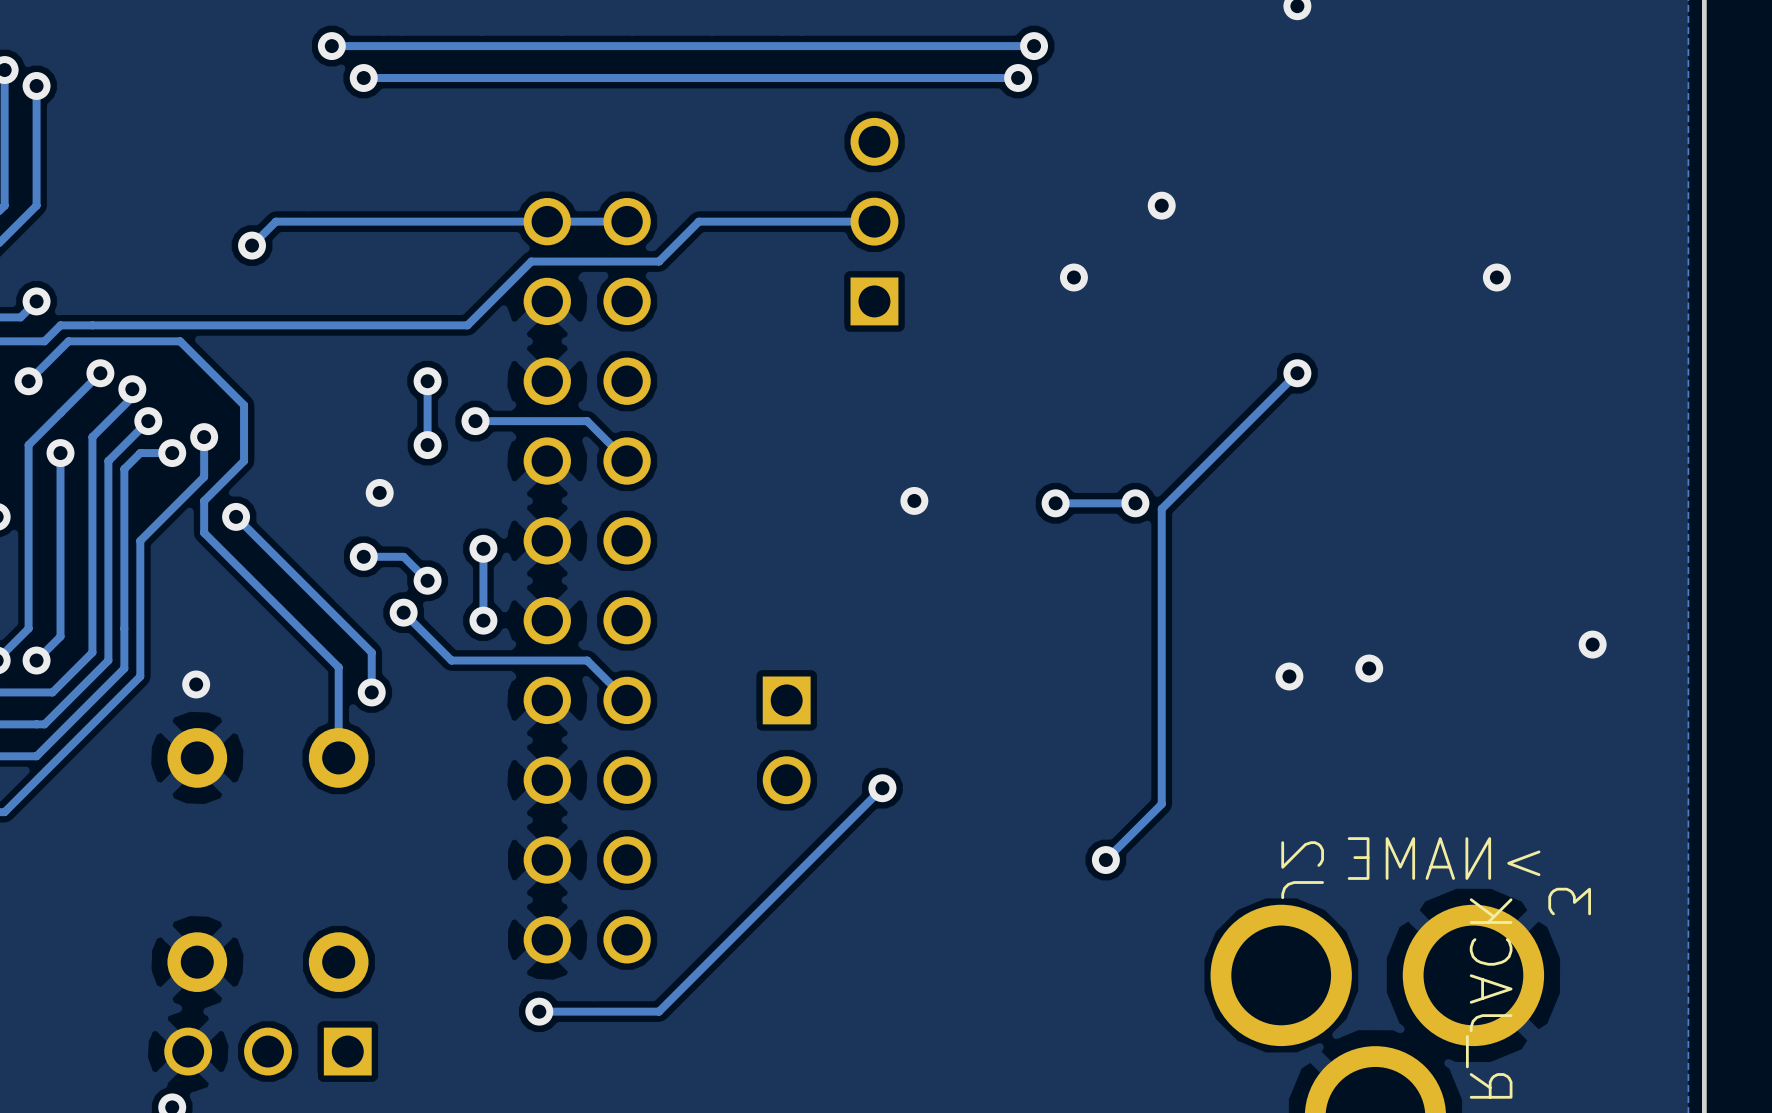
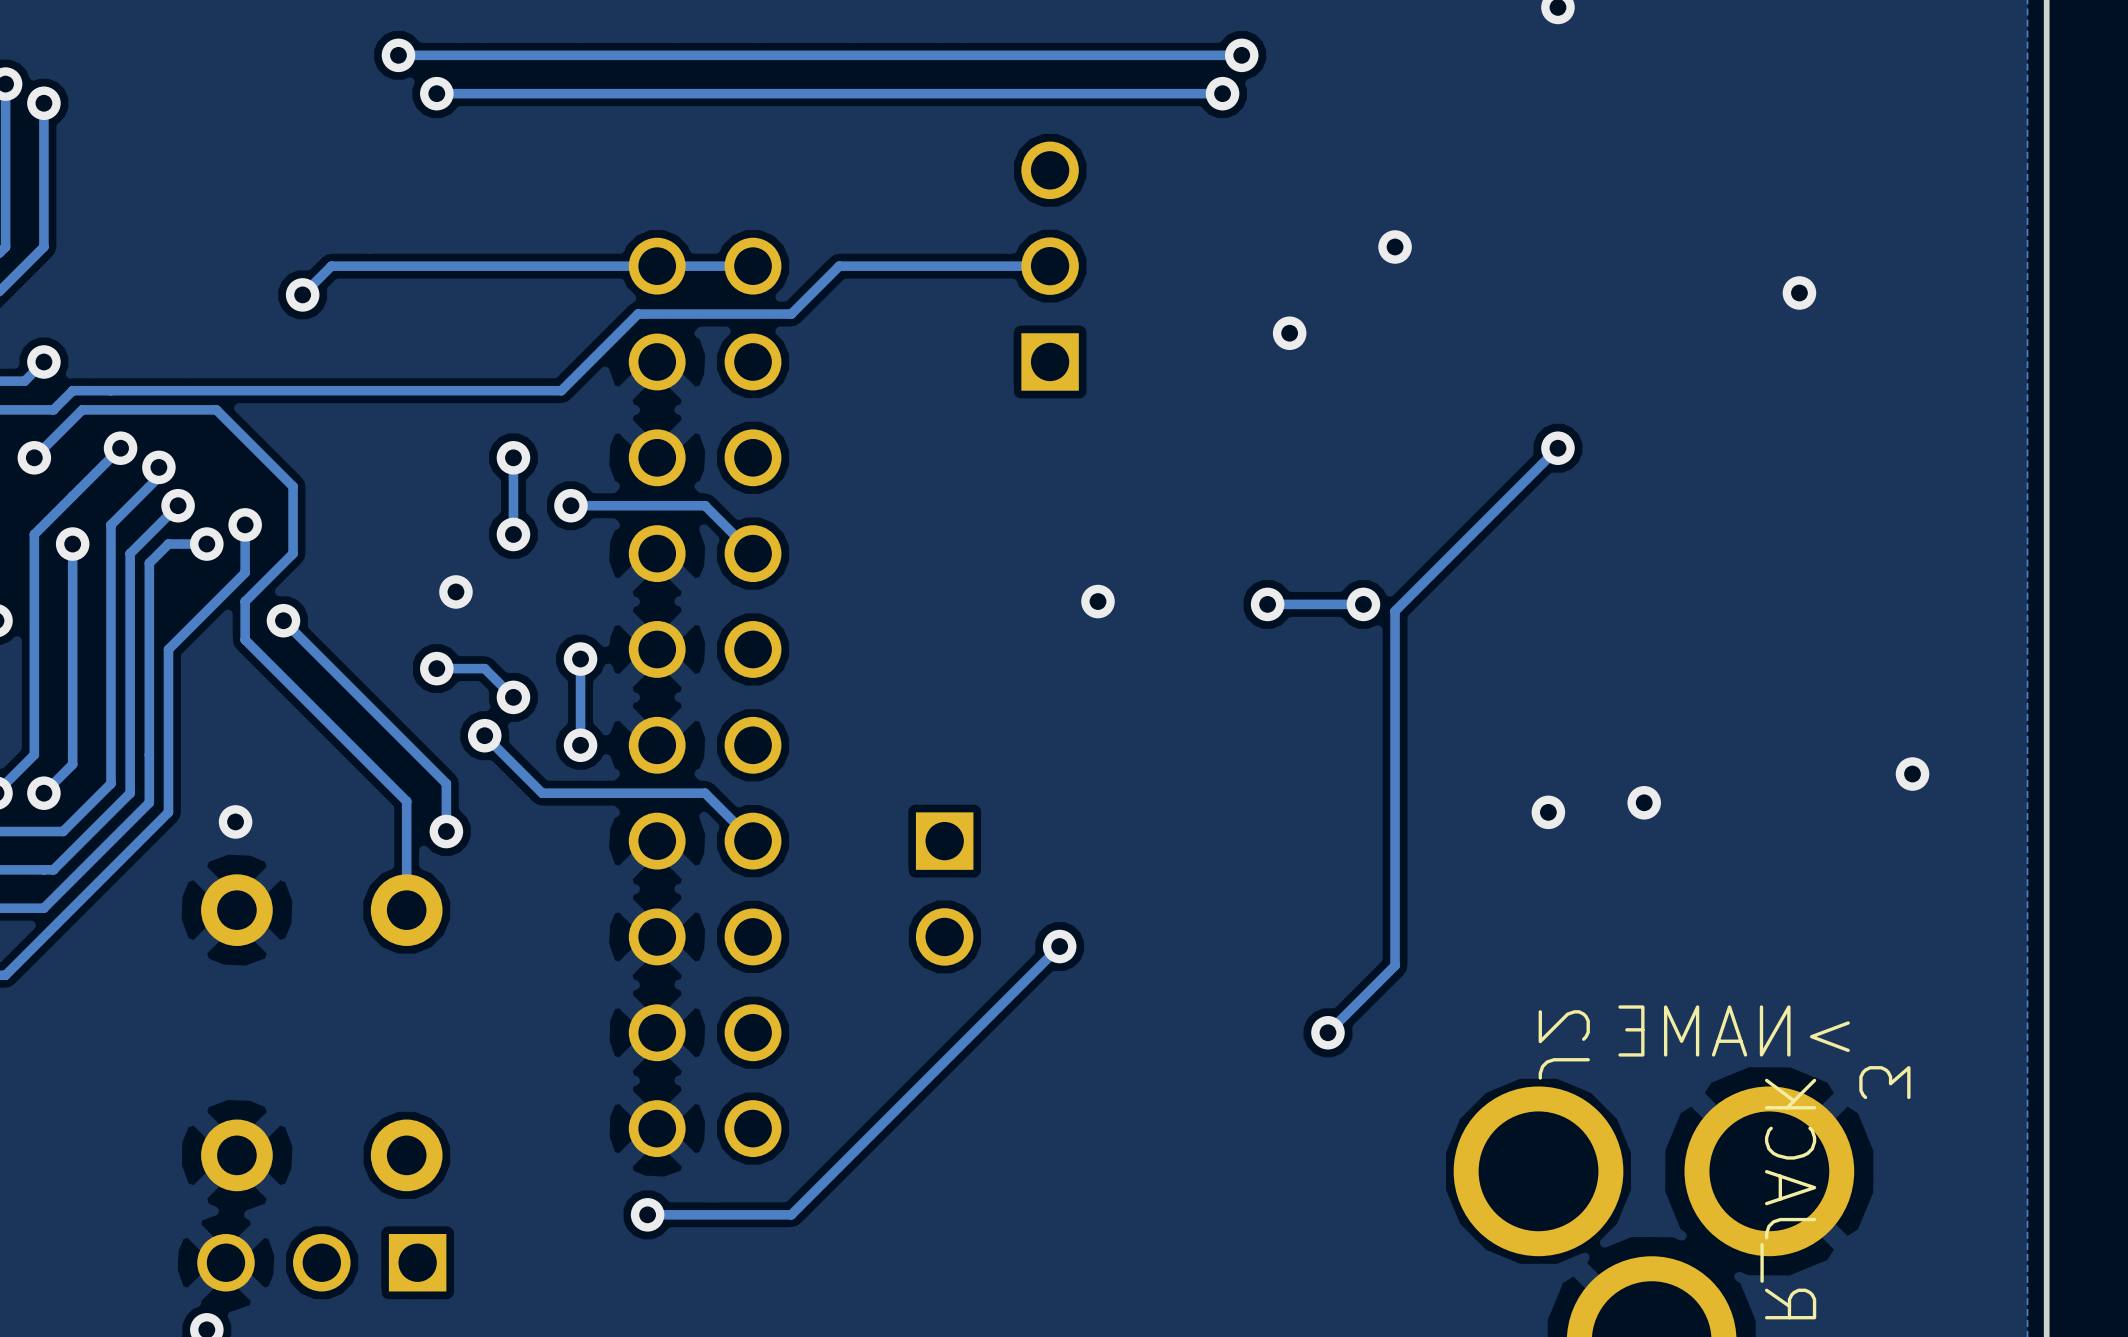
via position: (1496, 277) -> (1799, 292)

